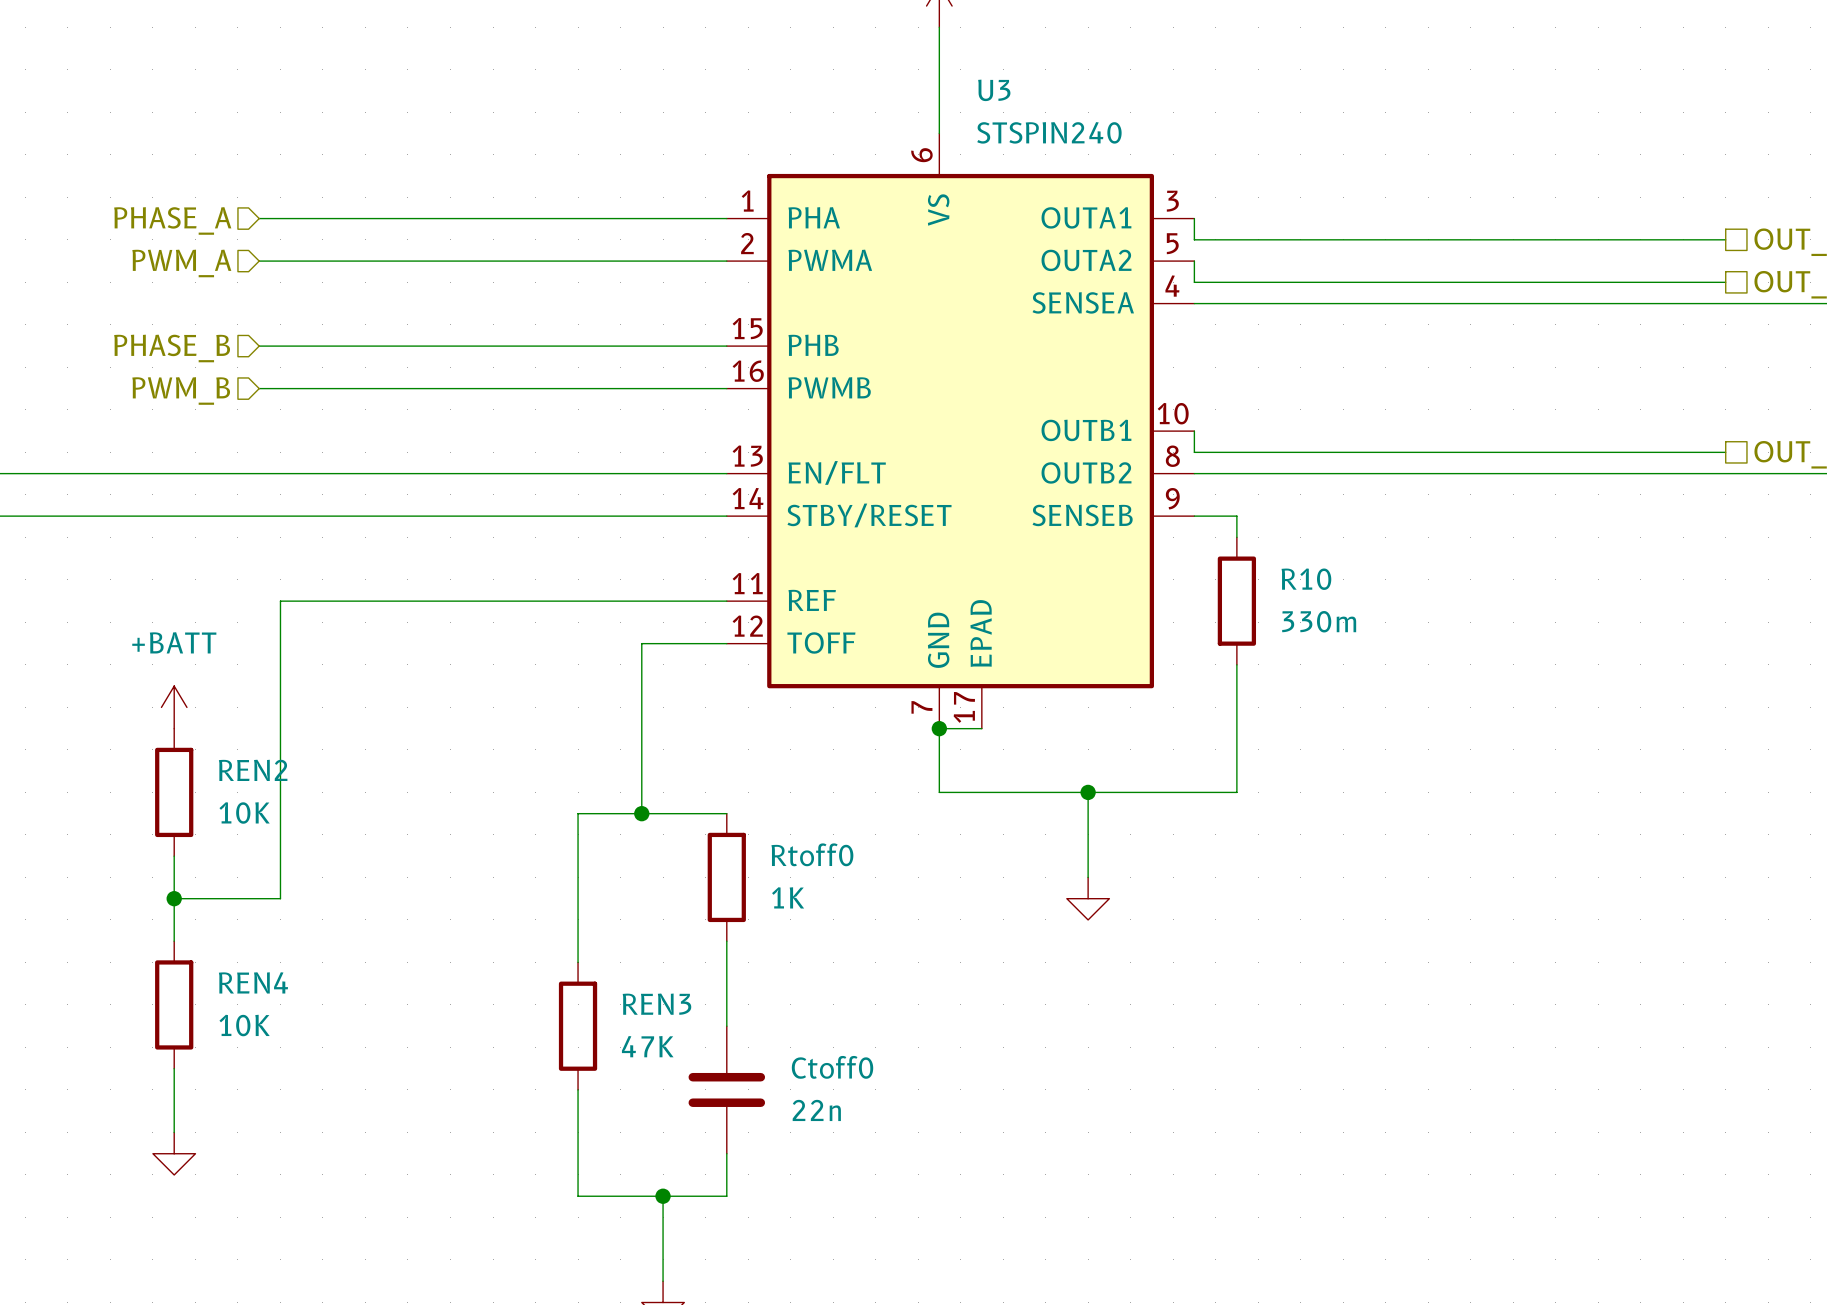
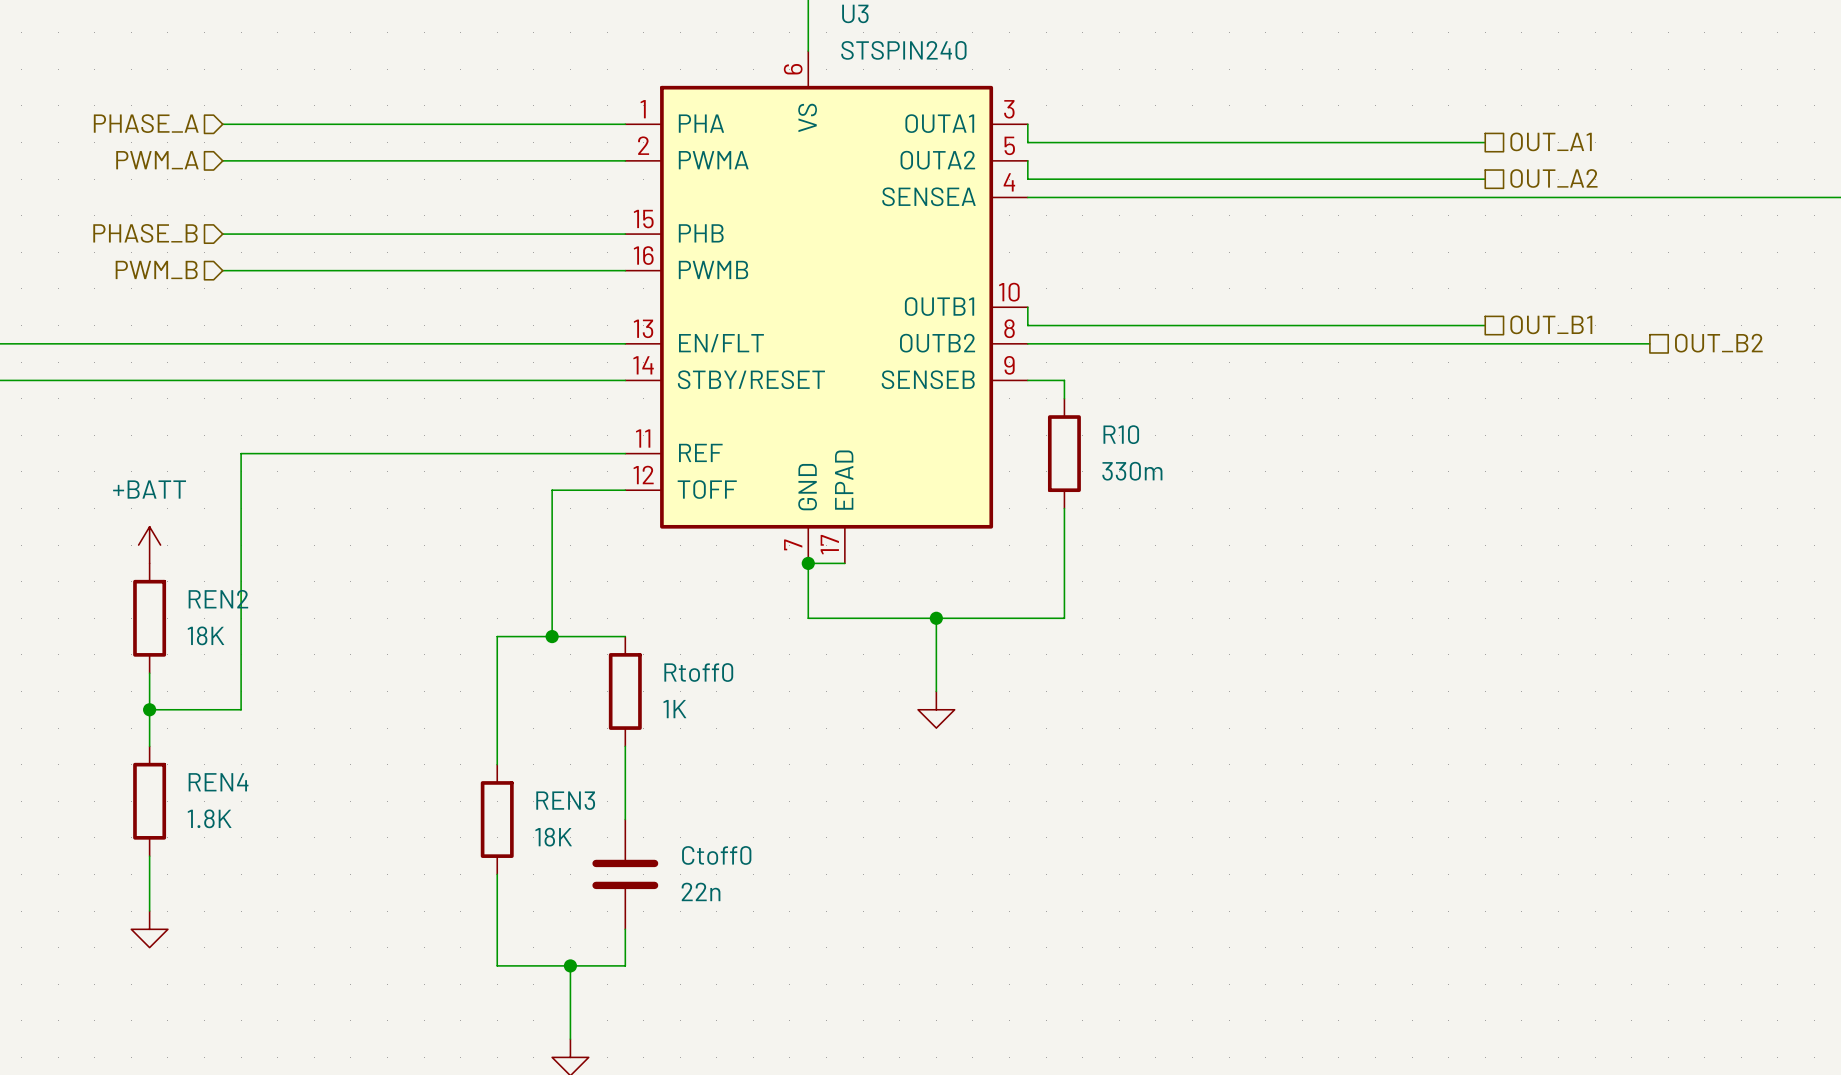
REN2 value: 10K (244, 812) -> 18K (205, 635)
REN4 value: 10K (244, 1025) -> 1.8K (209, 818)
REN3 value: 47K (647, 1046) -> 18K (553, 837)

